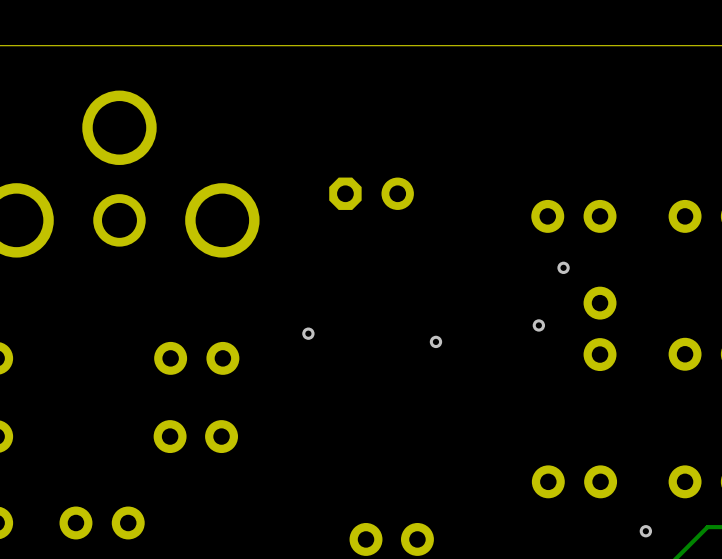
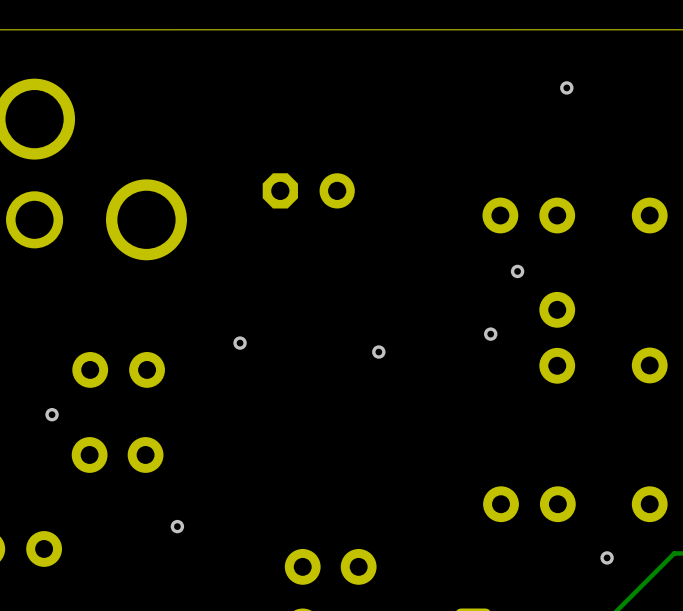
via: none -> (566, 87)
via: none -> (52, 414)
via: none -> (177, 526)

